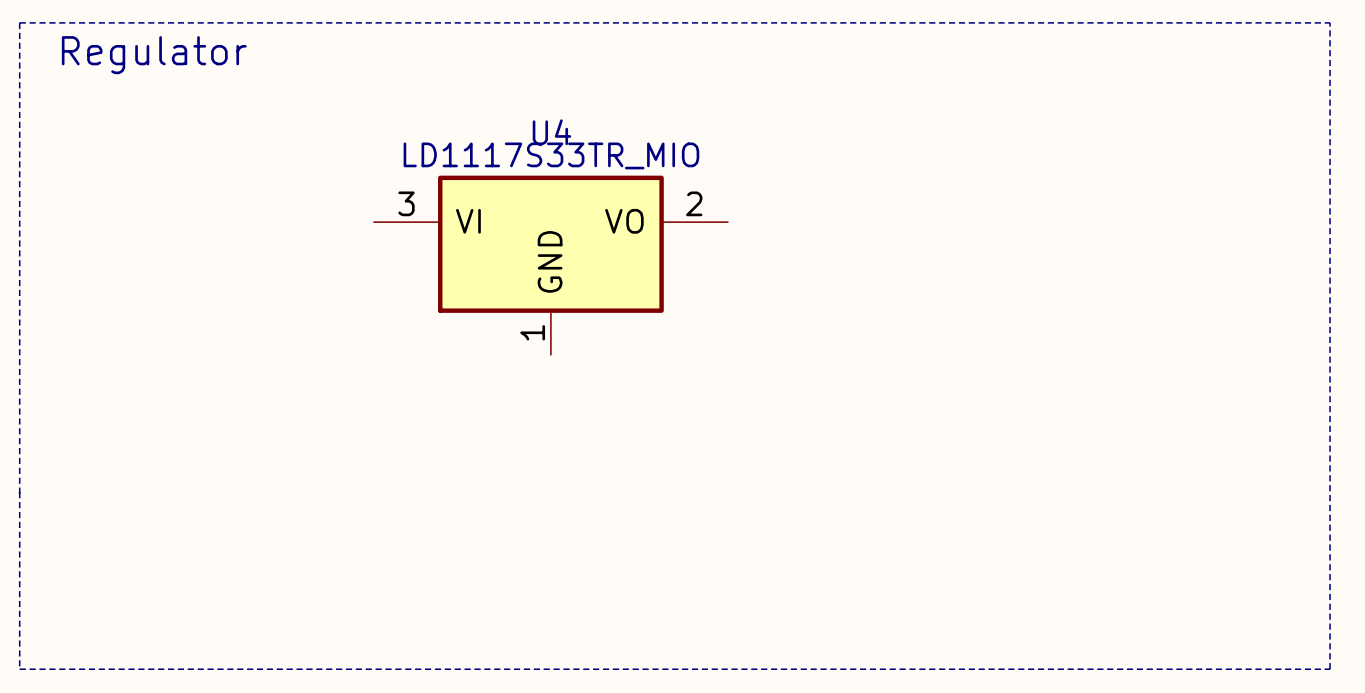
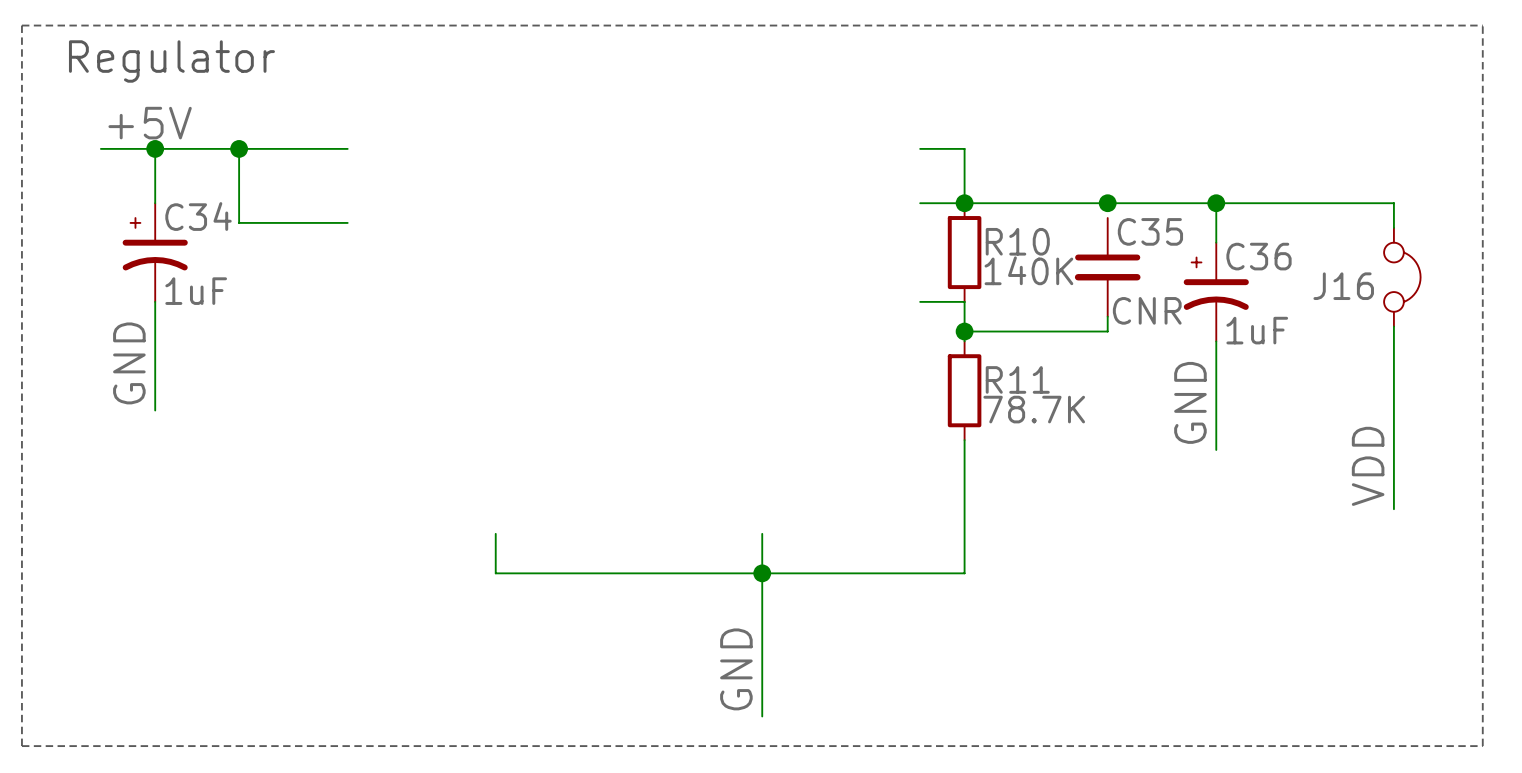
label: none -> +5V (150, 123)
wire: none -> (100, 148) (347, 148)
wire: none -> (155, 148) (155, 203)
junction: none -> (155, 148)
wire: none -> (239, 148) (239, 222) (347, 222)
junction: none -> (239, 148)
wire: none -> (920, 148) (964, 148) (964, 203)
wire: none -> (920, 203) (1393, 203) (1393, 227)
junction: none -> (964, 203)
junction: none -> (1107, 203)
wire: none -> (1216, 203) (1216, 242)
junction: none -> (1216, 203)
C34: none -> 1uF (155, 252)
R10: none -> 140K (964, 252)
C35: none -> CNR (1107, 267)
J16: none -> (1402, 277)
C36: none -> 1uF (1216, 292)
U4: LD1117S33TR_MIO (550, 265) -> none
wire: none -> (155, 301) (155, 410)
wire: none -> (920, 301) (964, 301) (964, 341)
wire: none -> (1107, 316) (1107, 331) (964, 331)
wire: none -> (1393, 326) (1393, 509)
junction: none -> (964, 331)
wire: none -> (1216, 341) (1216, 449)
label: none -> GND (129, 363)
R11: none -> 78.7K (964, 390)
label: none -> GND (1190, 402)
wire: none -> (964, 440) (964, 573) (495, 573) (495, 533)
label: none -> VDD (1368, 466)
wire: none -> (762, 533) (762, 716)
junction: none -> (762, 573)
label: none -> GND (736, 669)

